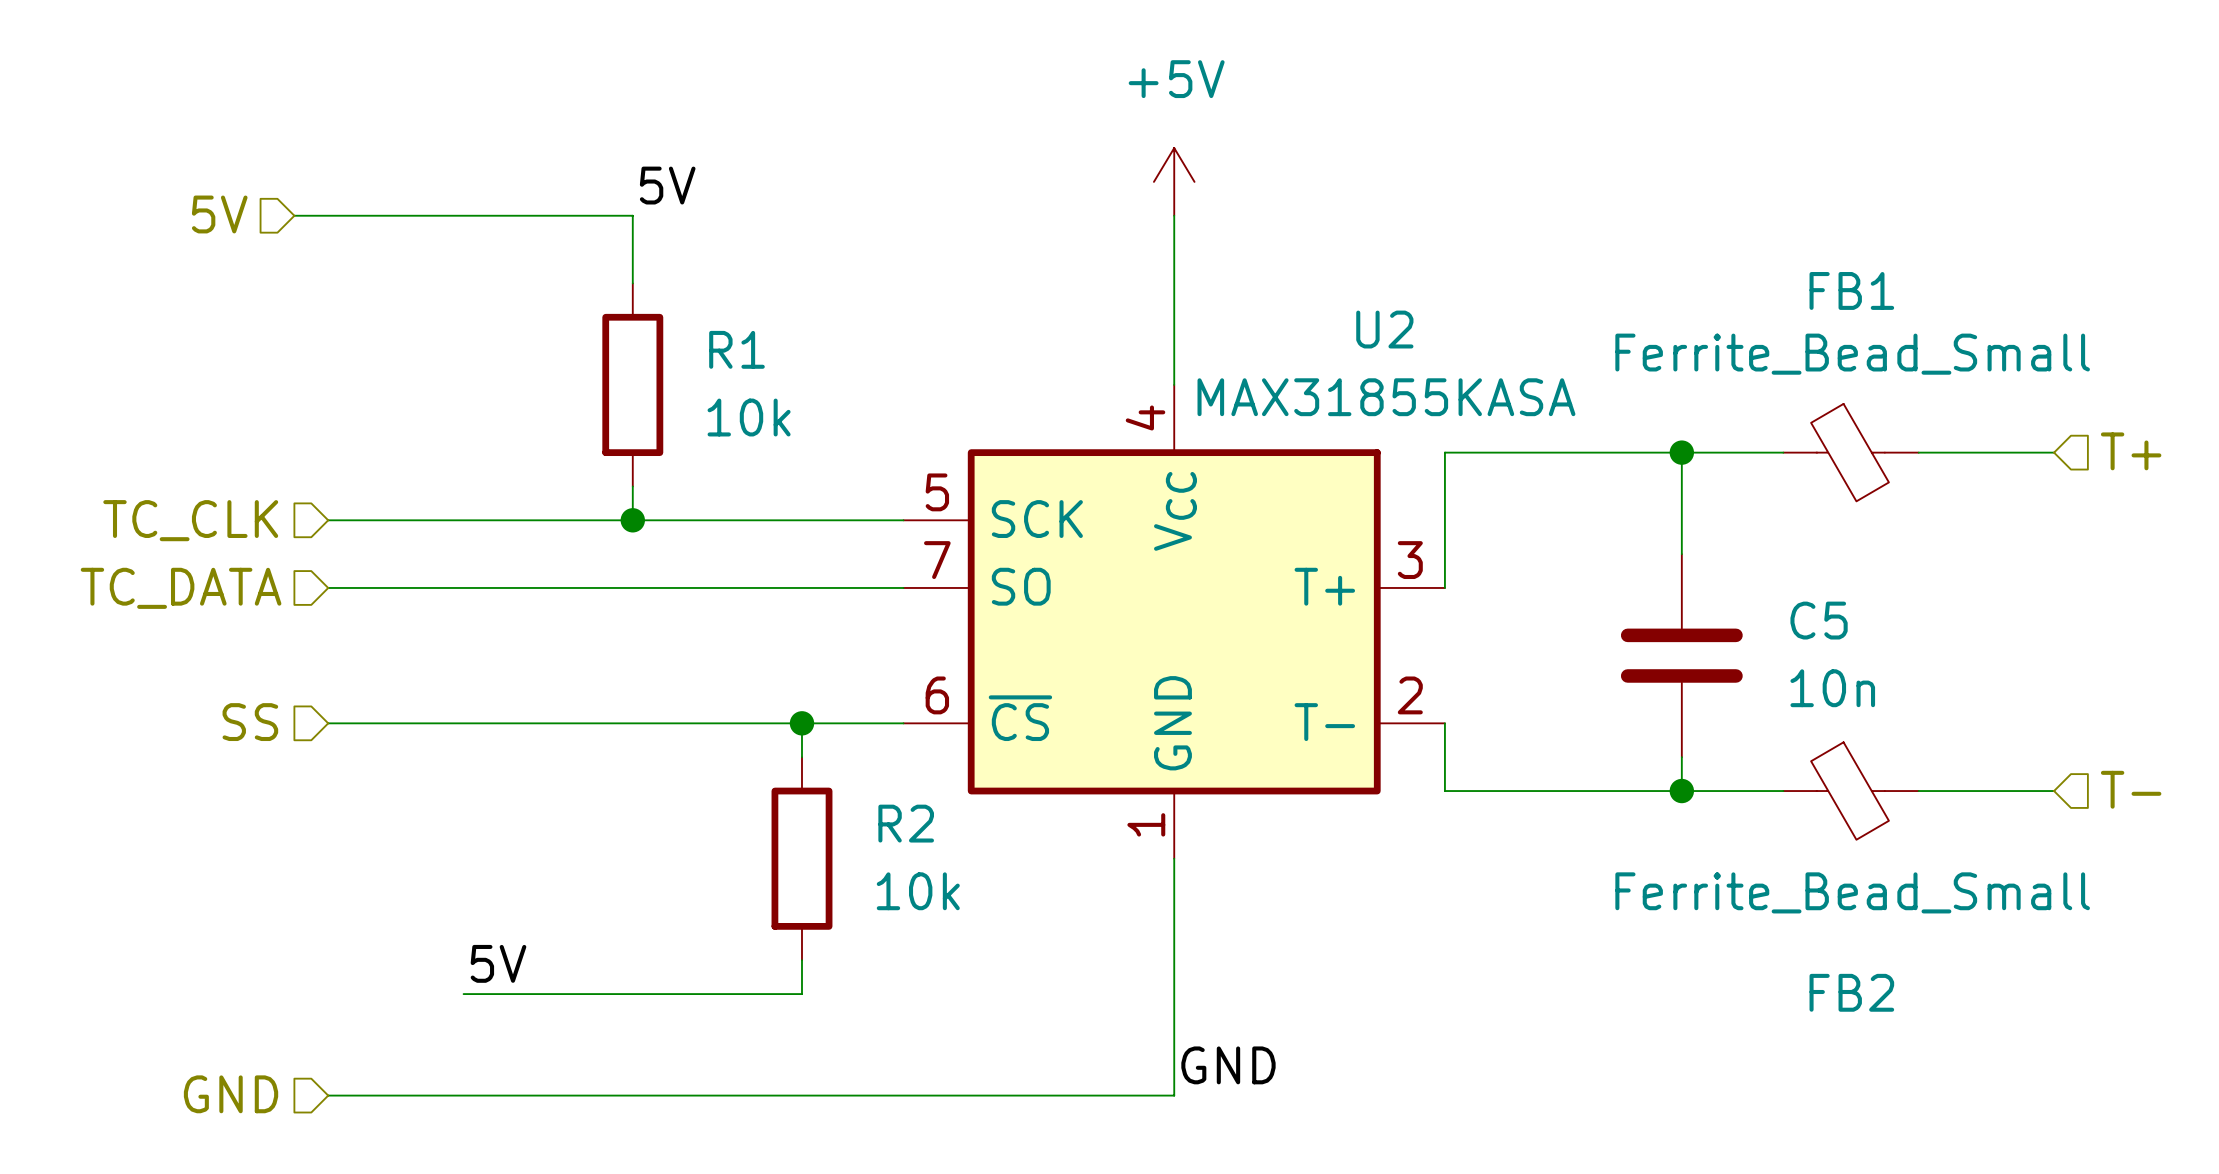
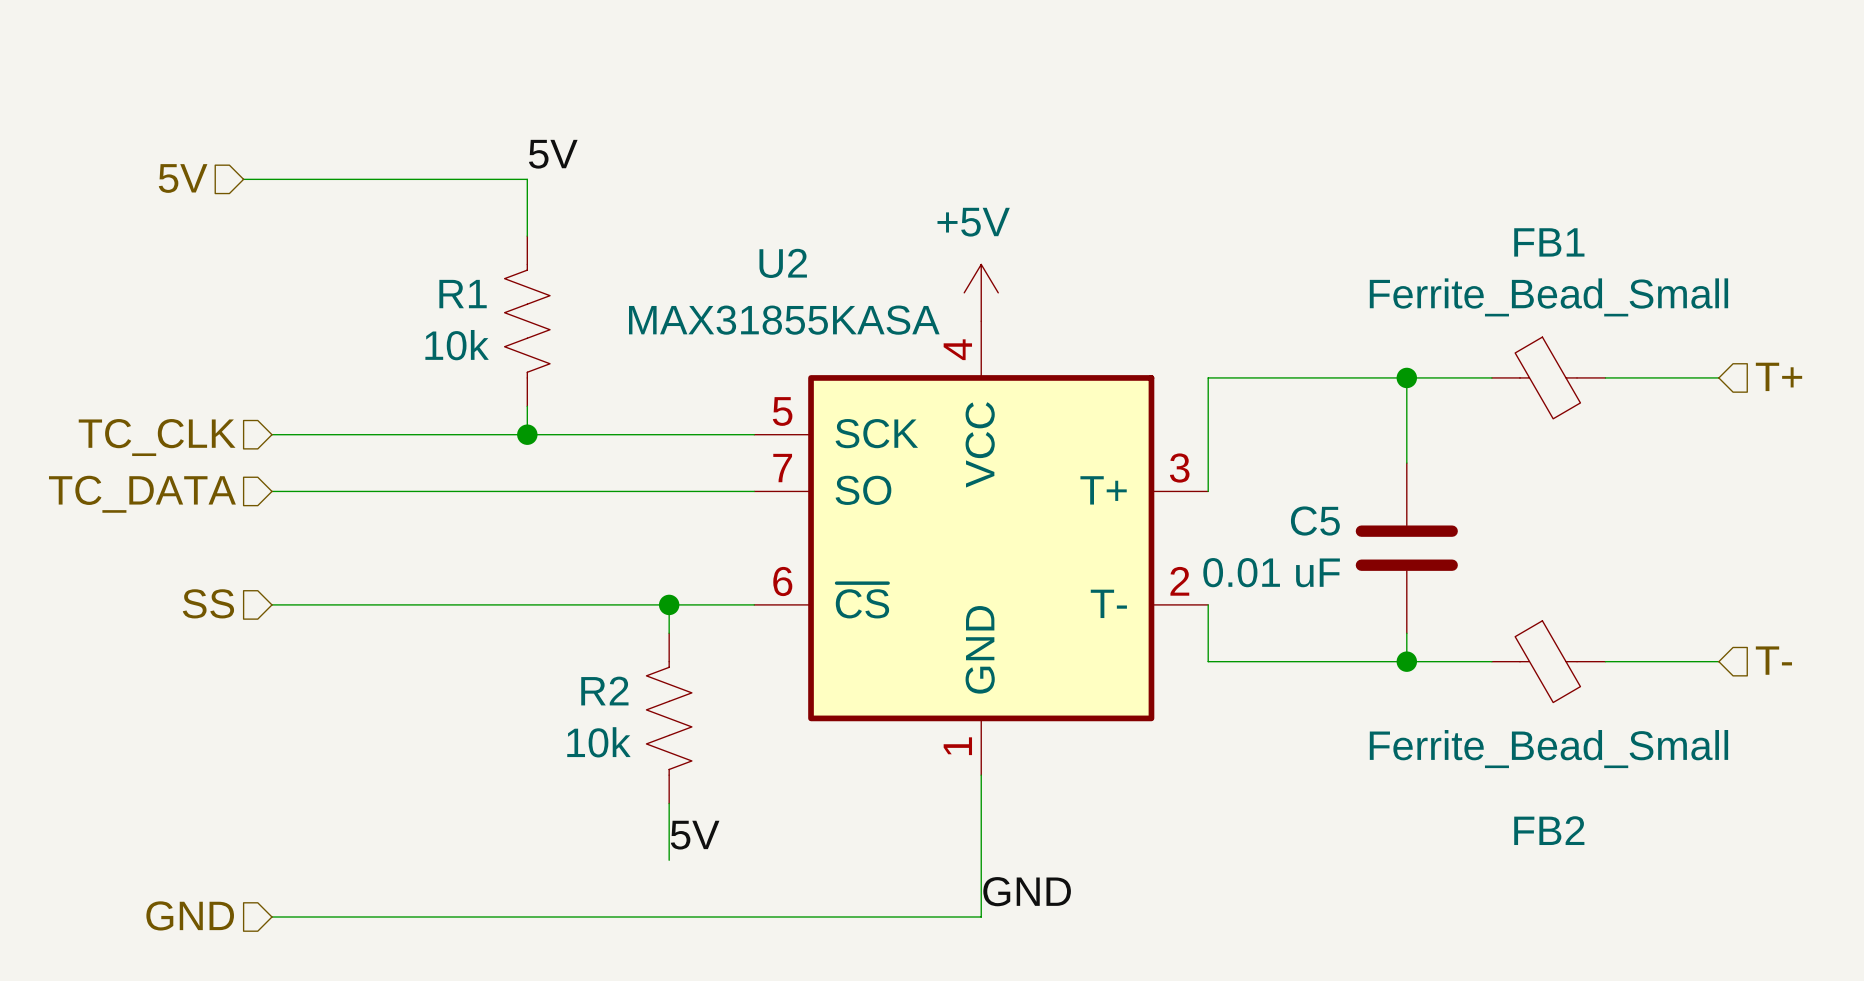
power symbol text position: +5V (1176, 79) -> +5V (973, 222)
power symbol position: +5V (1174, 181) -> +5V (981, 292)
wire: (1174, 215) (1174, 384) -> none
R1 symbol: [602, 283, 664, 487] -> [504, 236, 551, 407]
U2 name position: U2 (1384, 329) -> U2 (783, 263)
R1 name position: R1 (736, 349) -> R1 (463, 294)
U2 symbol: [903, 384, 1445, 859] -> [754, 321, 1209, 776]
U2 value position: MAX31855KASA (1386, 397) -> MAX31855KASA (784, 320)
R1 value position: 10k (749, 417) -> 10k (457, 345)
C5 name position: C5 (1819, 620) -> C5 (1315, 521)
C5 value: 10n (1832, 688) -> 0.01 uF (1271, 572)
R2 symbol: [771, 757, 833, 961] -> [646, 633, 692, 804]
R2 name position: R2 (906, 823) -> R2 (604, 691)
R2 value position: 10k (918, 891) -> 10k (598, 742)
label position: 5V (498, 963) -> 5V (695, 835)
wire: (463, 994) (801, 994) -> (669, 860) (669, 831)

